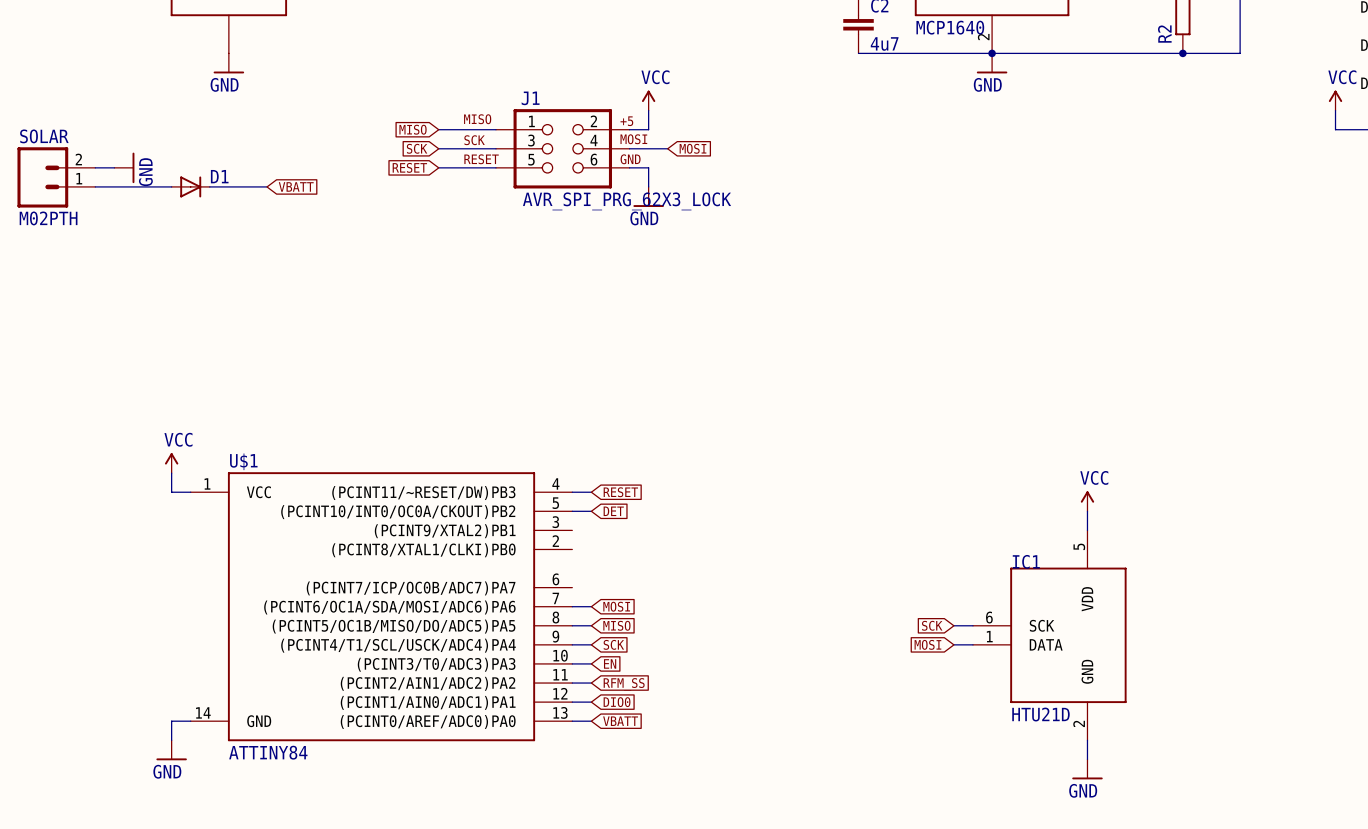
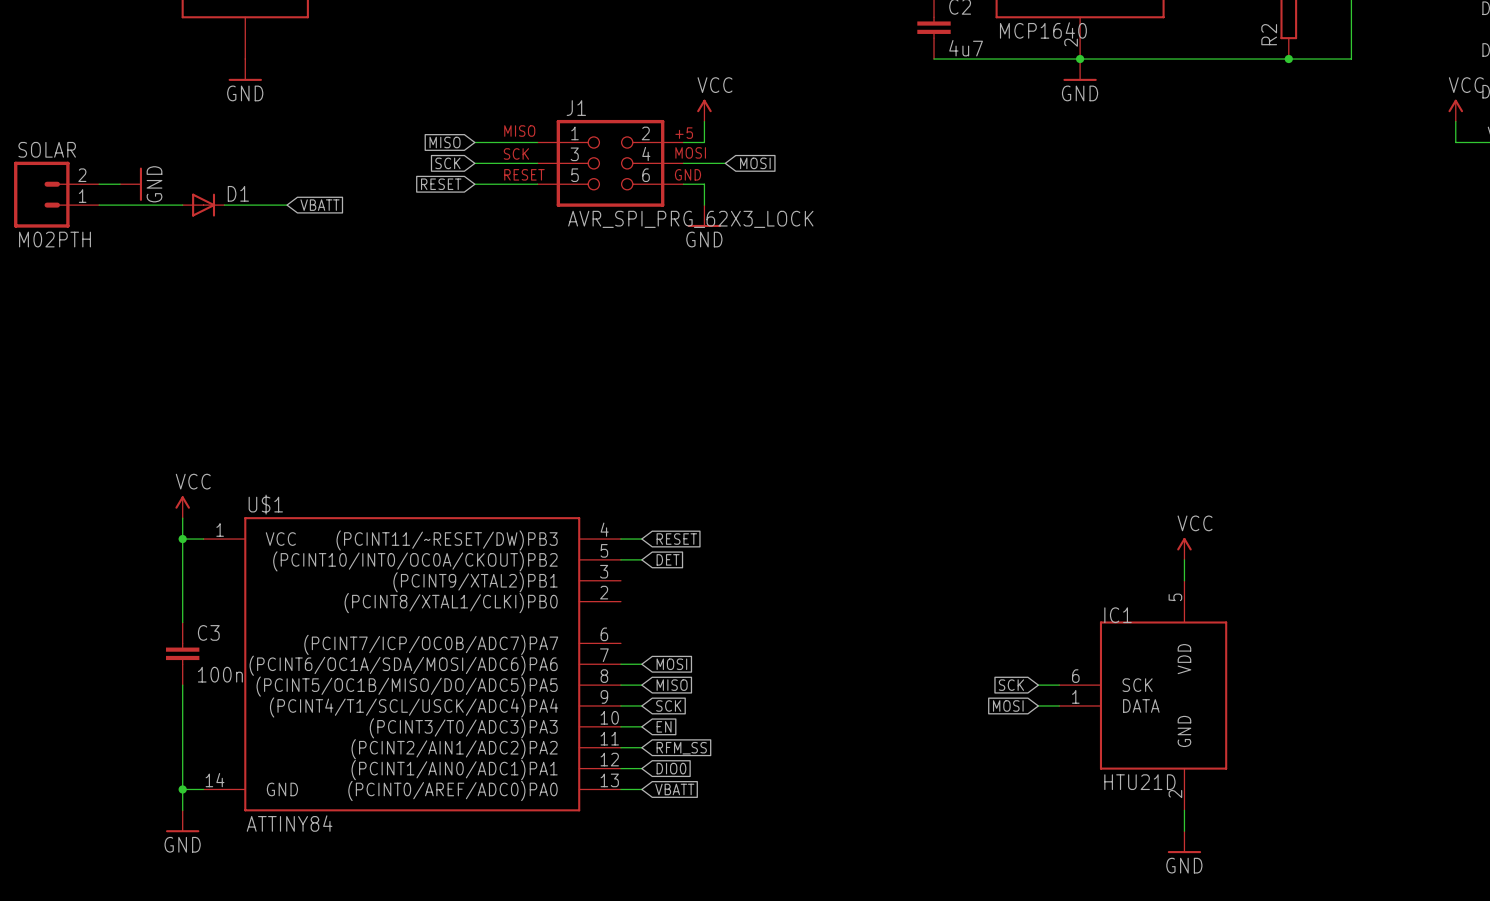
wire: none -> (182, 539) (182, 622)
junction: none -> (182, 539)
C3: none -> 100n (182, 653)
wire: none -> (182, 685) (182, 789)
junction: none -> (182, 789)

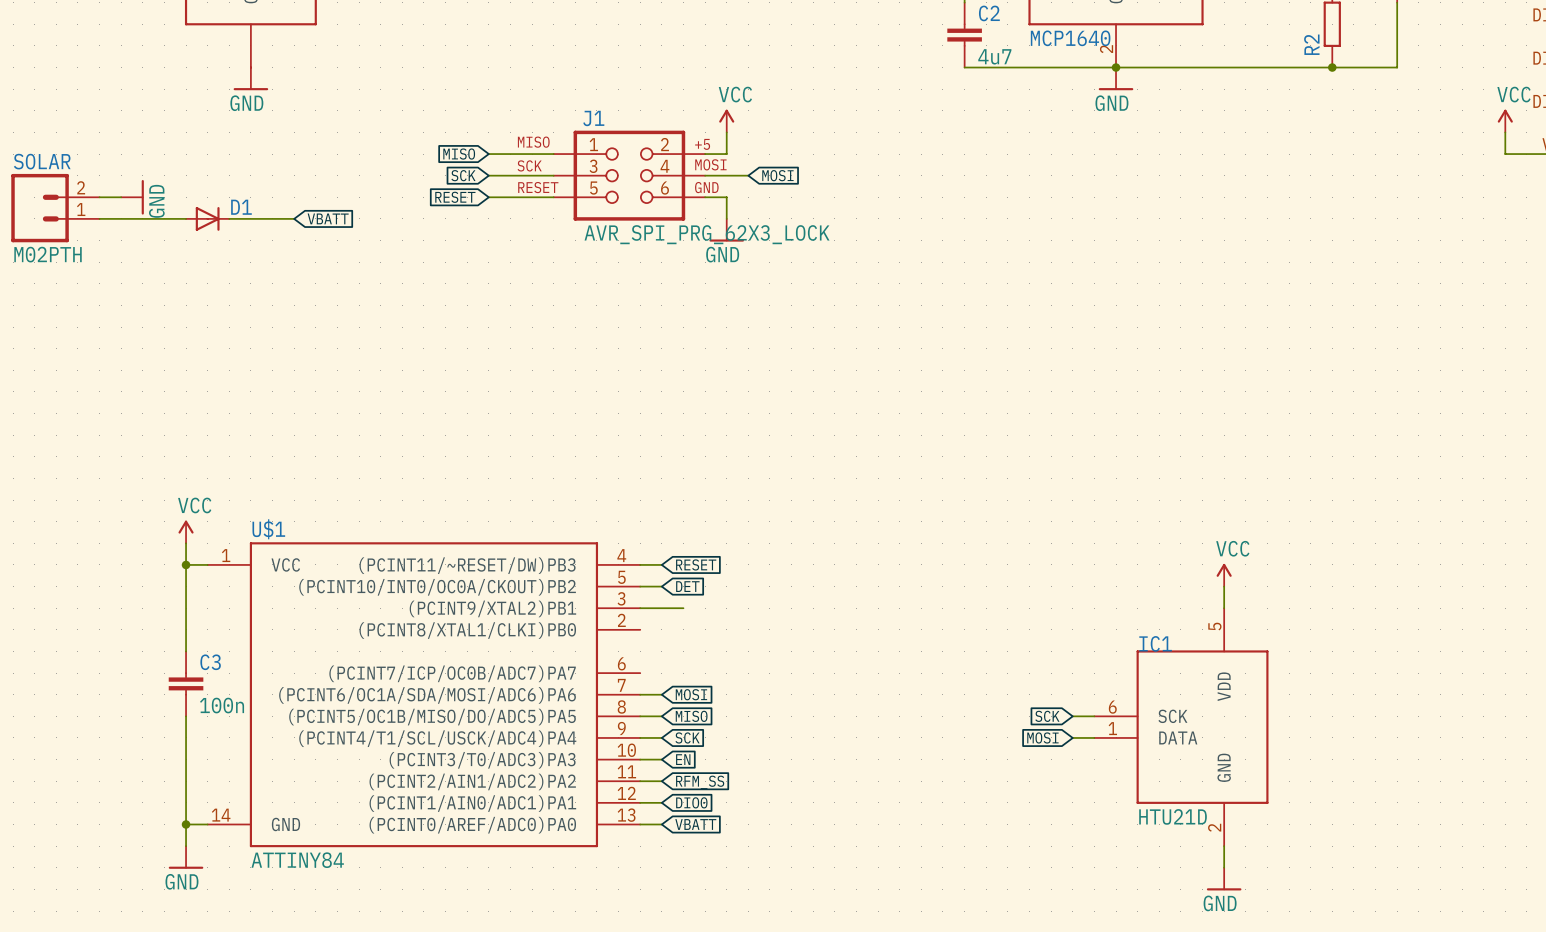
wire: none -> (640, 608) (683, 608)

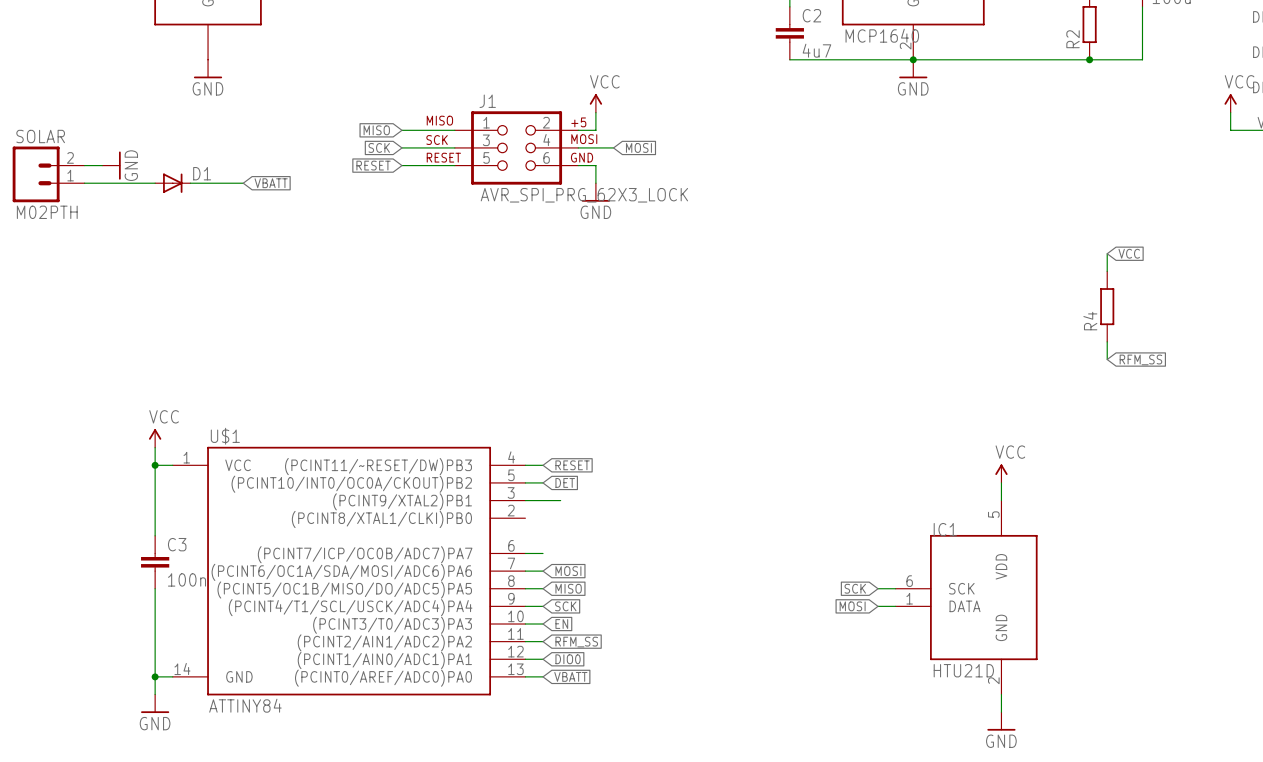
wire: none -> (1107, 253) (1107, 271)
global label: none -> VCC (1129, 253)
R4: none -> (1107, 306)
wire: none -> (1107, 341) (1107, 359)
global label: none -> RFM_SS (1140, 359)
wire: none -> (525, 553) (543, 553)

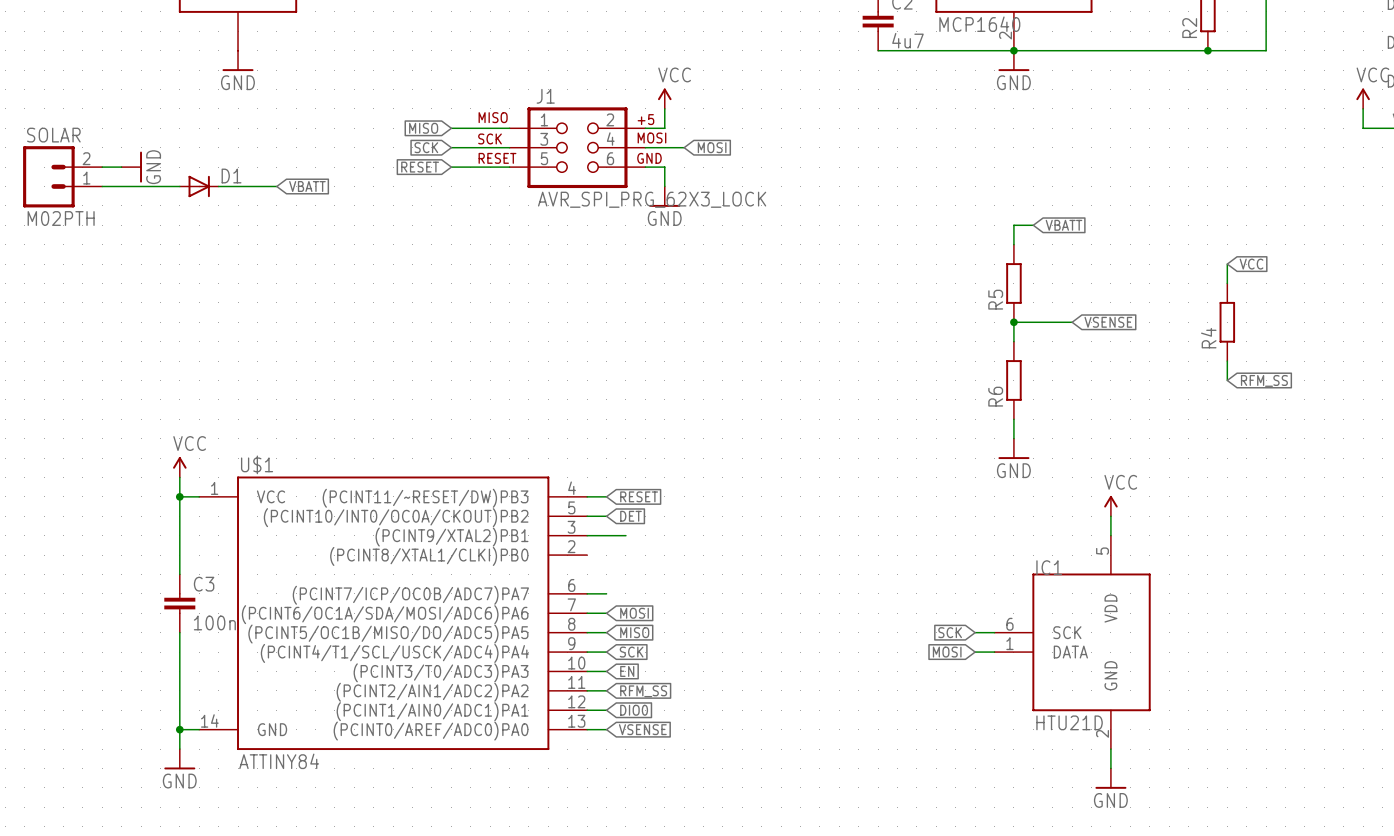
wire: none -> (1033, 225) (1013, 225) (1013, 244)
global label: none -> VBATT (1063, 225)
R5: none -> (1013, 283)
junction: none -> (1013, 322)
wire: none -> (1072, 322) (1013, 322) (1013, 341)
global label: none -> VSENSE (1108, 322)
R6: none -> (1013, 380)
wire: none -> (1013, 419) (1013, 438)
power symbol: none -> GND (1013, 448)
global label: VBATT (570, 676) -> VSENSE (642, 729)

